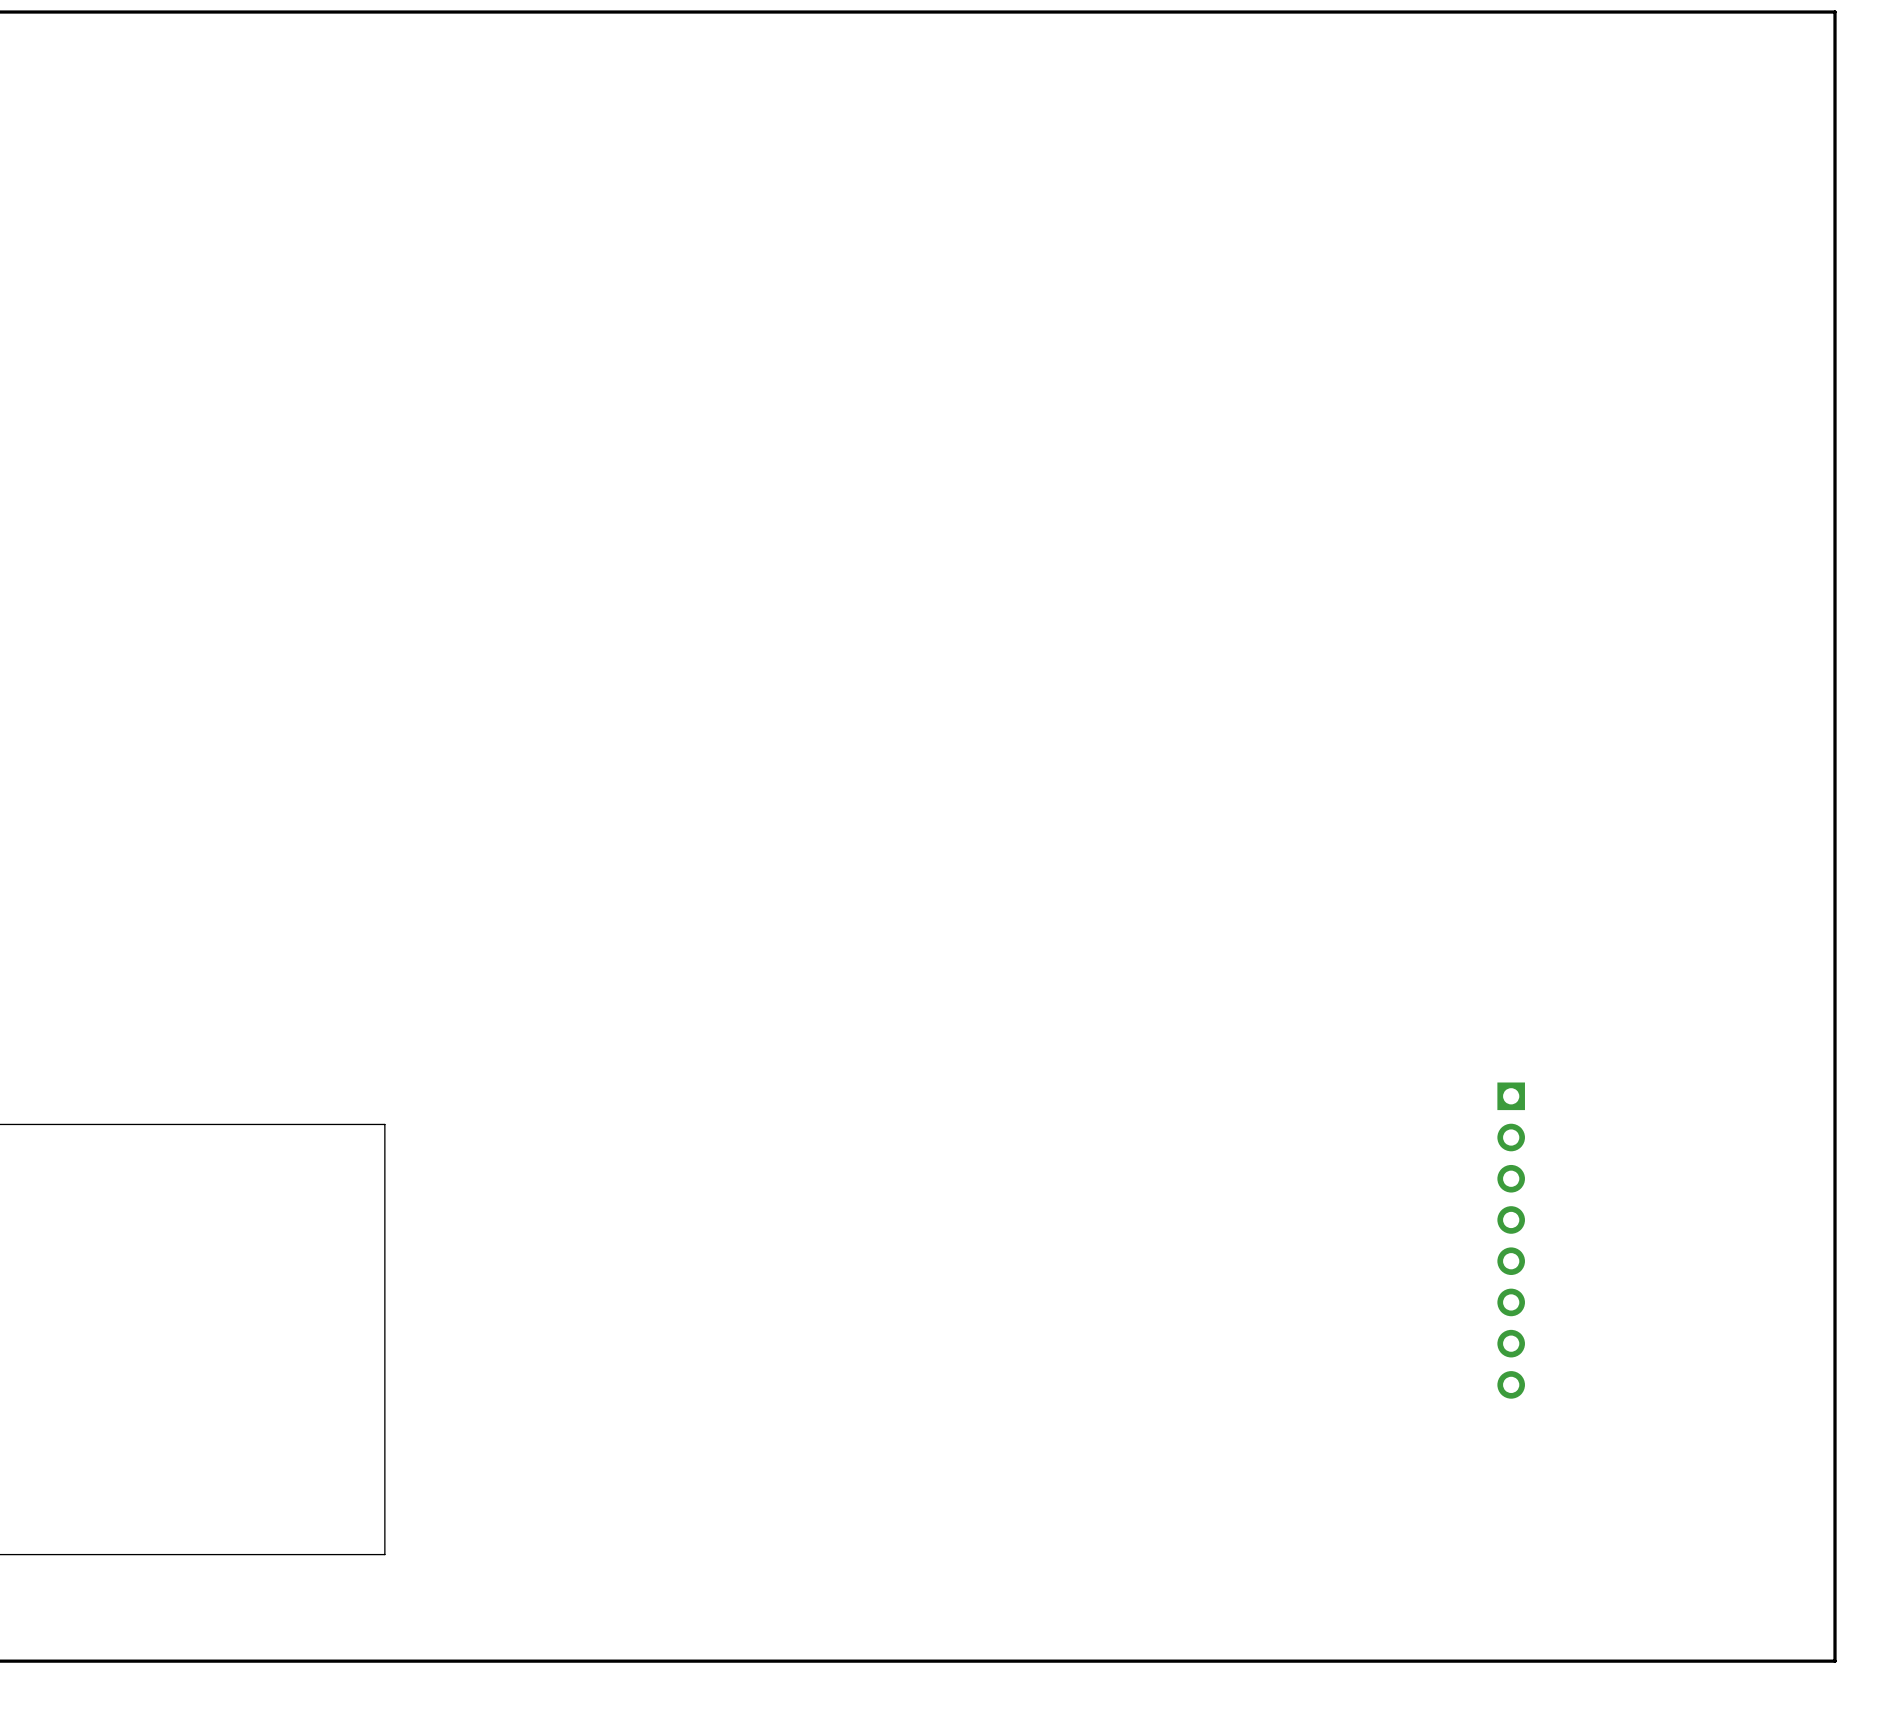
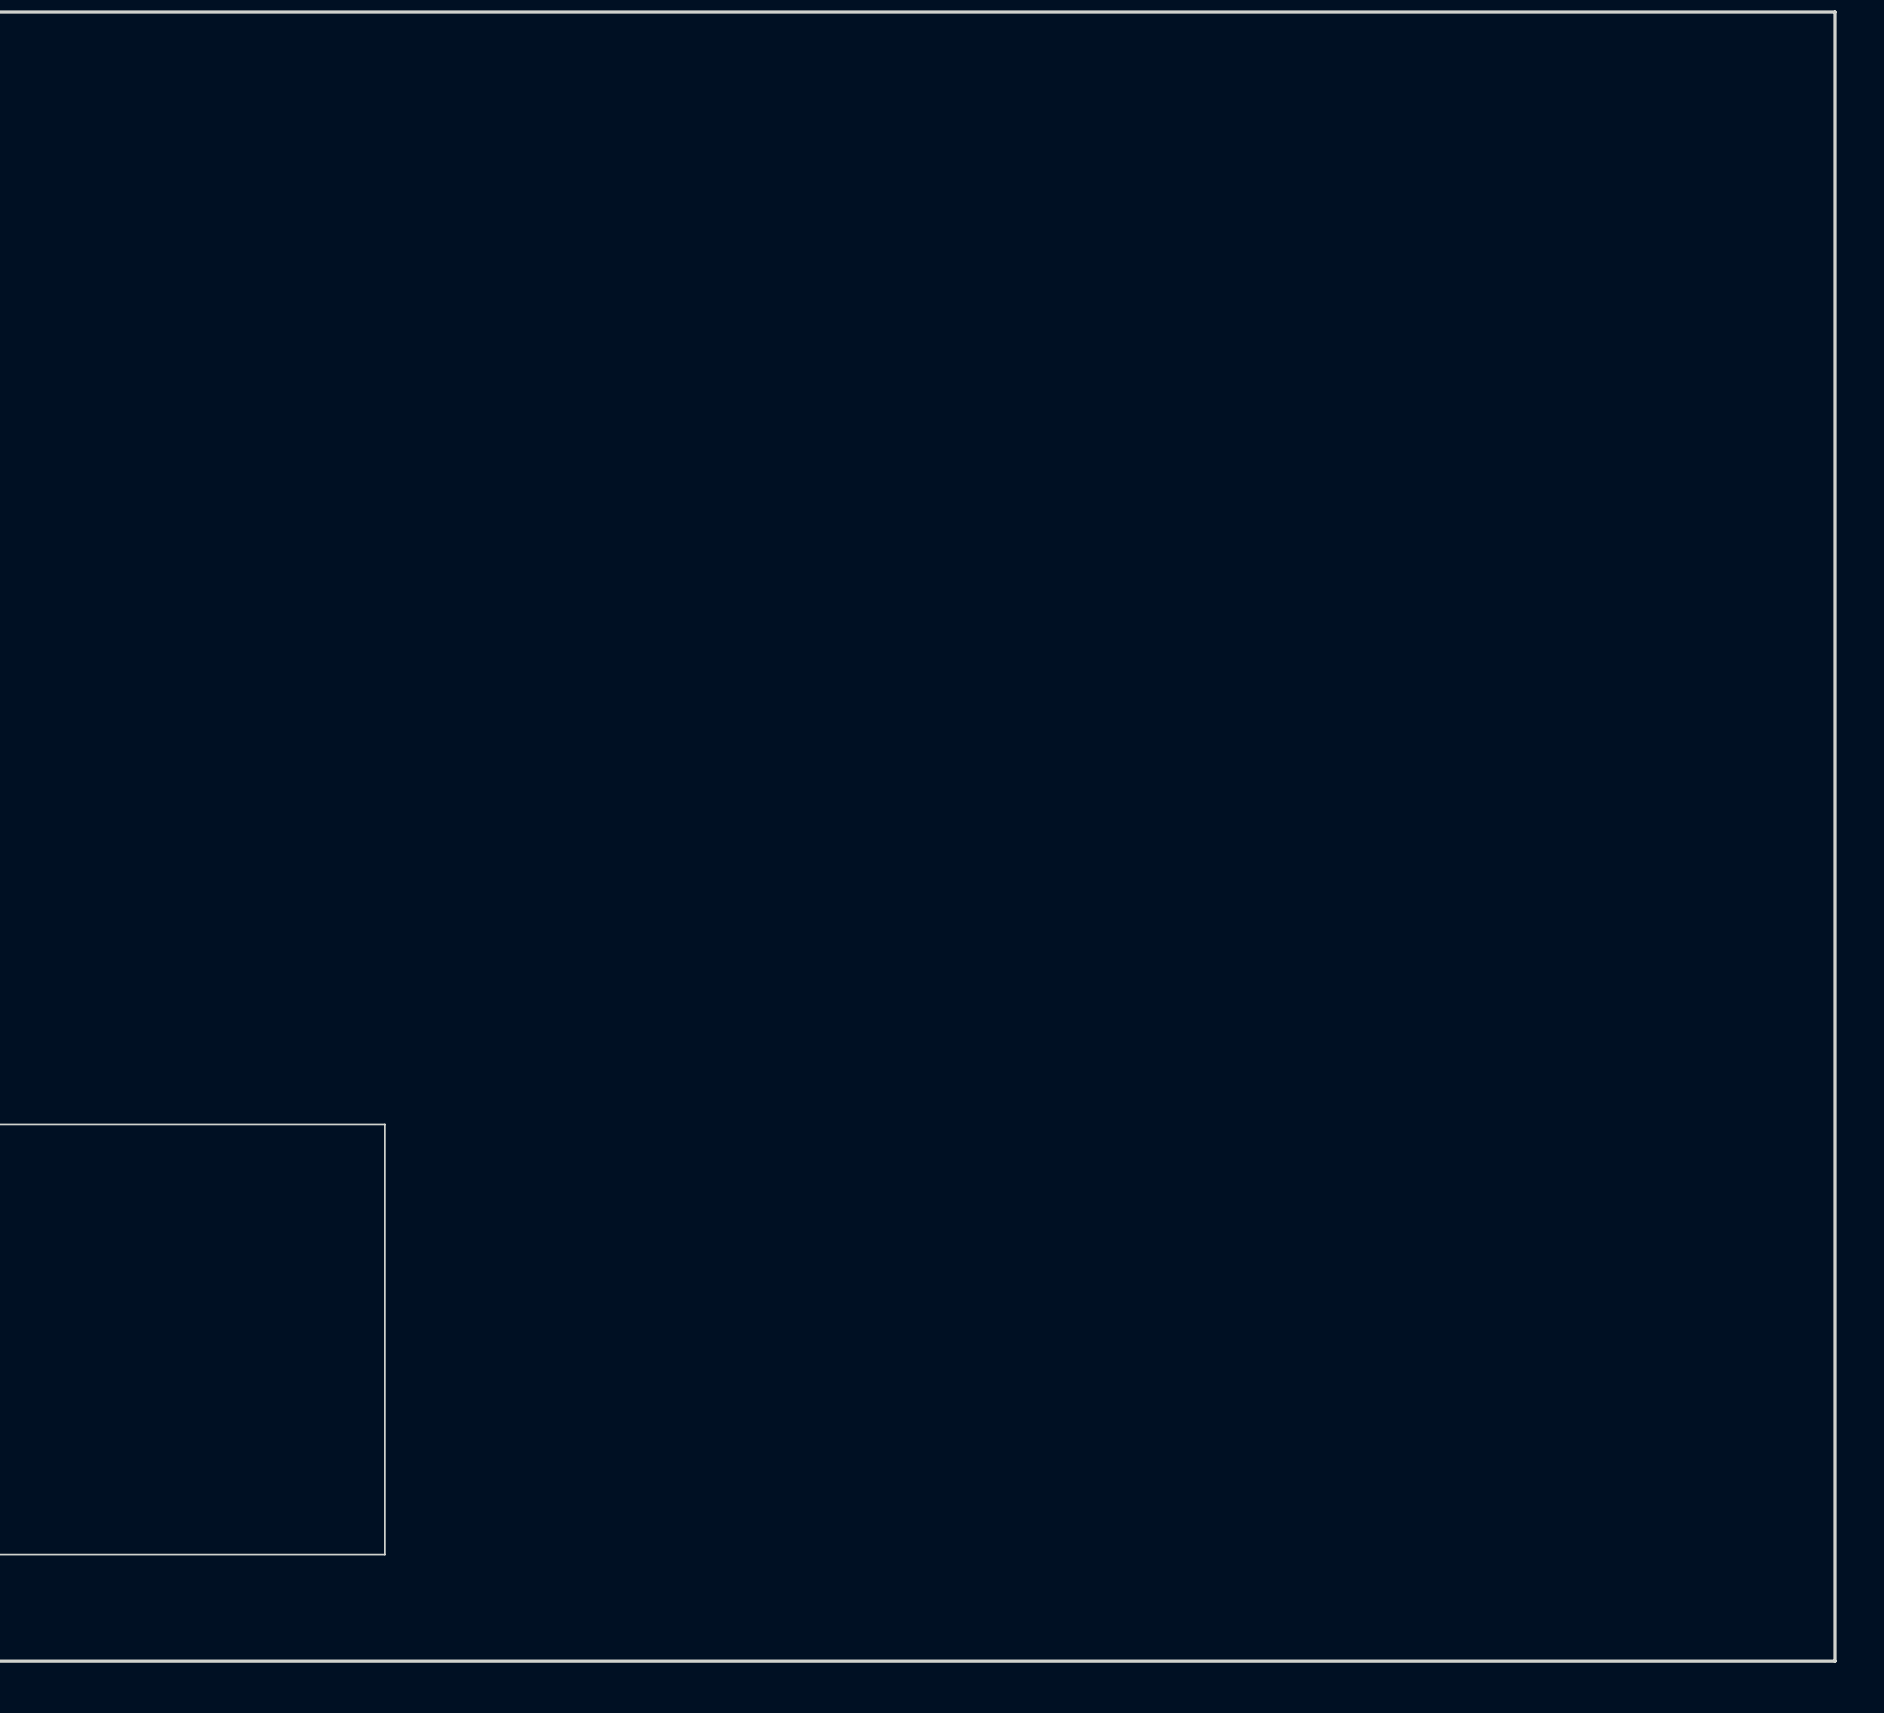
part: (1511, 1240) -> none

